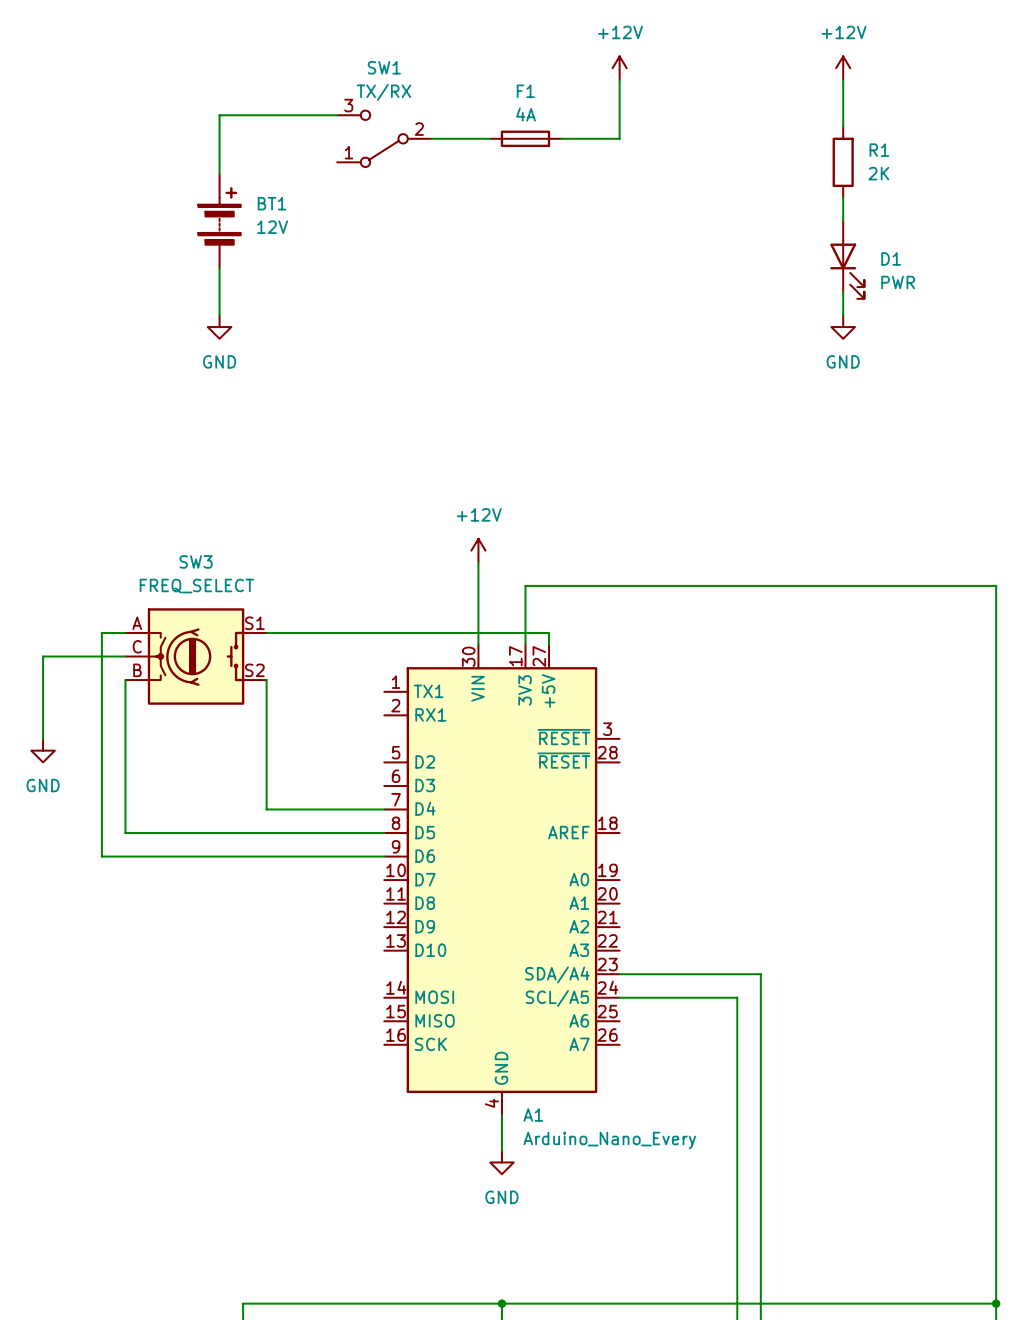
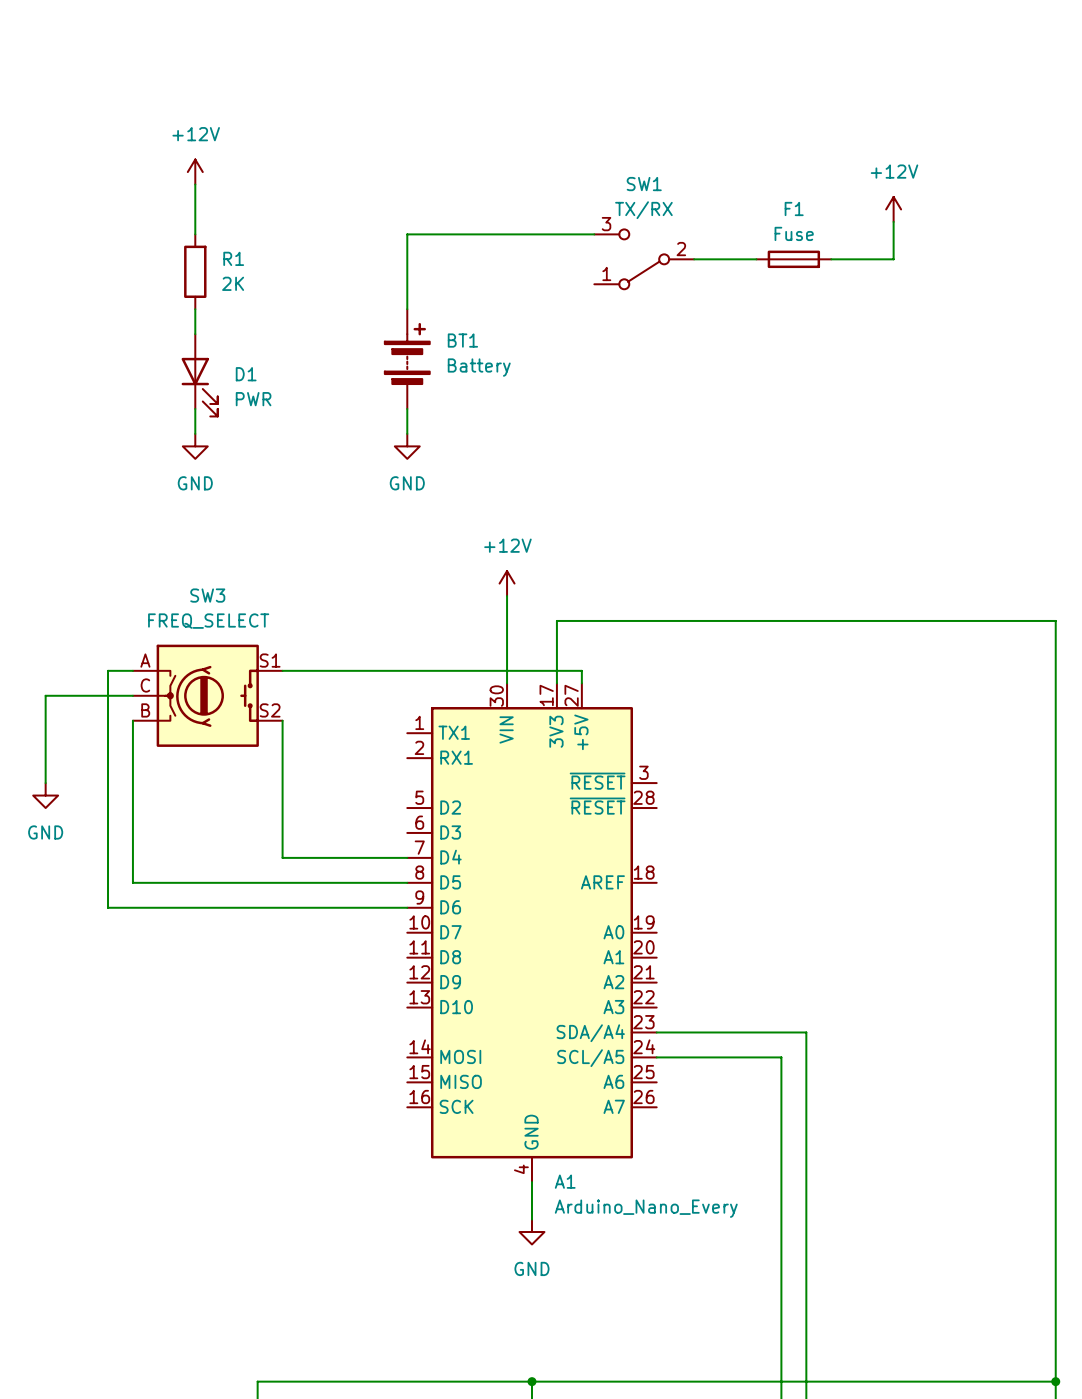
power symbol: +12V (619, 68) -> none
power symbol: +12V (843, 68) -> none
wire: (619, 79) (619, 138) (560, 138) -> none
wire: (843, 79) (843, 127) -> none
F1 value: 4A (526, 114) -> Fuse (794, 233)
wire: (337, 115) (219, 115) (219, 174) -> none
SW1 position: (384, 138) -> (644, 259)
wire: (431, 138) (490, 138) -> none
F1 position: (525, 138) -> (793, 259)
power symbol: none -> +12V (195, 172)
R1 position: (843, 162) -> (195, 271)
power symbol: none -> +12V (893, 209)
BT1 position: (219, 221) -> (407, 359)
wire: none -> (594, 234) (407, 234) (407, 309)
wire: none -> (893, 234) (893, 259) (831, 259)
BT1 value: 12V (272, 227) -> Battery (479, 367)
wire: none -> (694, 259) (756, 259)
D1 position: (847, 259) -> (199, 375)
wire: (219, 268) (219, 315) -> (195, 184) (195, 234)
wire: none -> (195, 309) (195, 334)
wire: (843, 291) (843, 315) -> none
power symbol: GND (219, 327) -> none
power symbol: GND (843, 327) -> none
wire: none -> (195, 408) (195, 433)
wire: none -> (407, 408) (407, 433)
power symbol: none -> GND (195, 446)
power symbol: none -> GND (407, 446)

